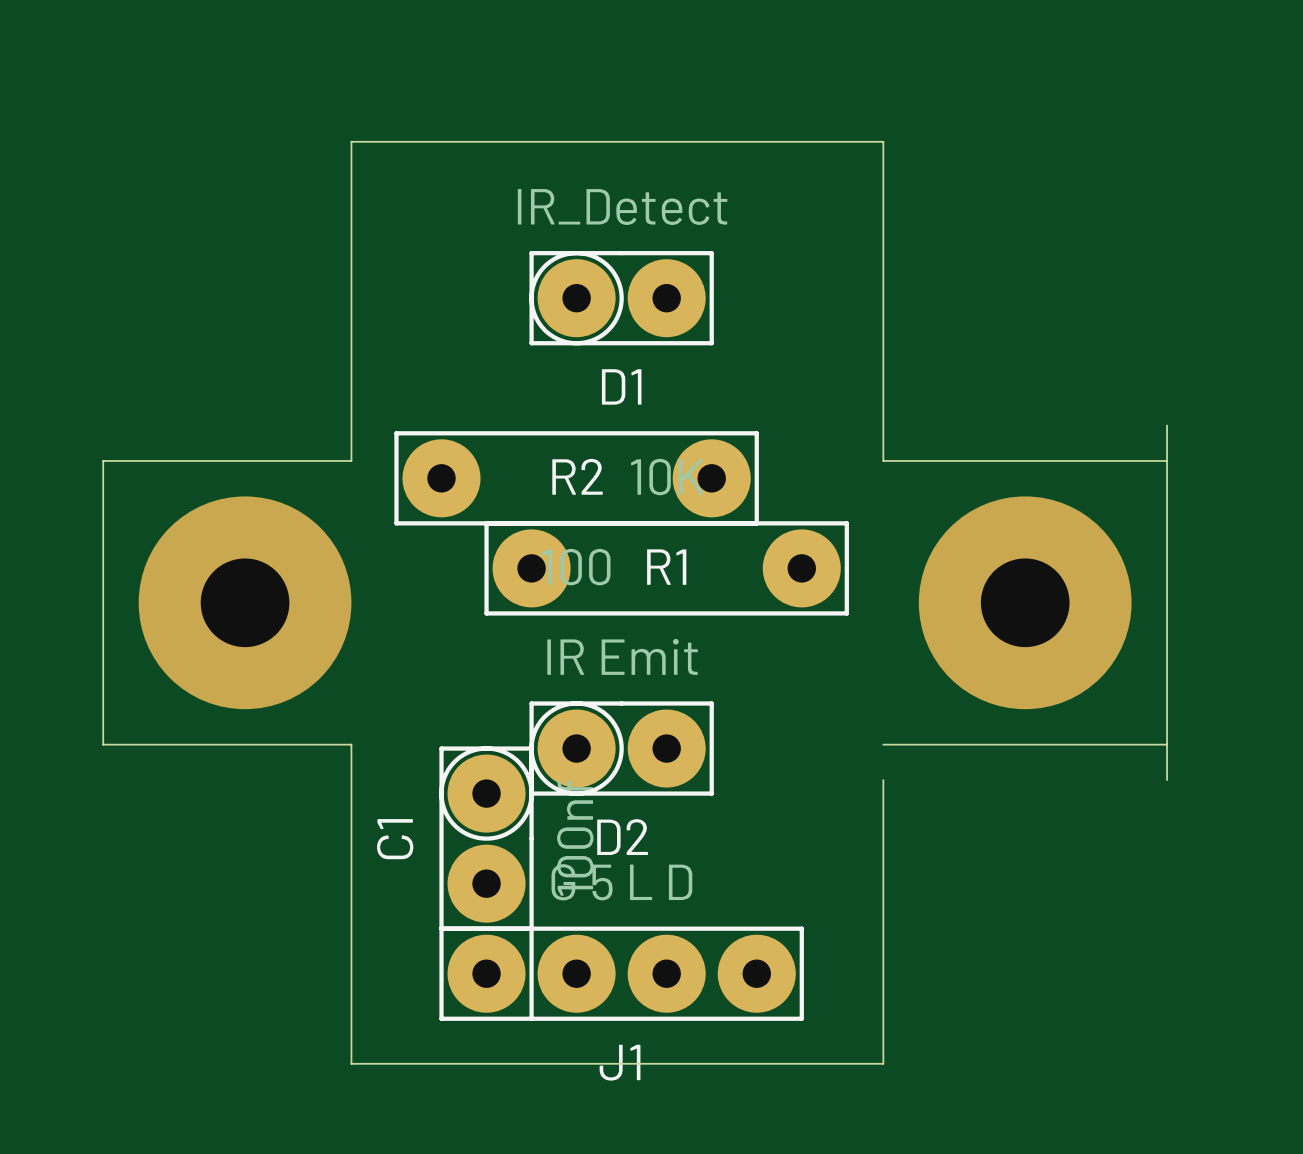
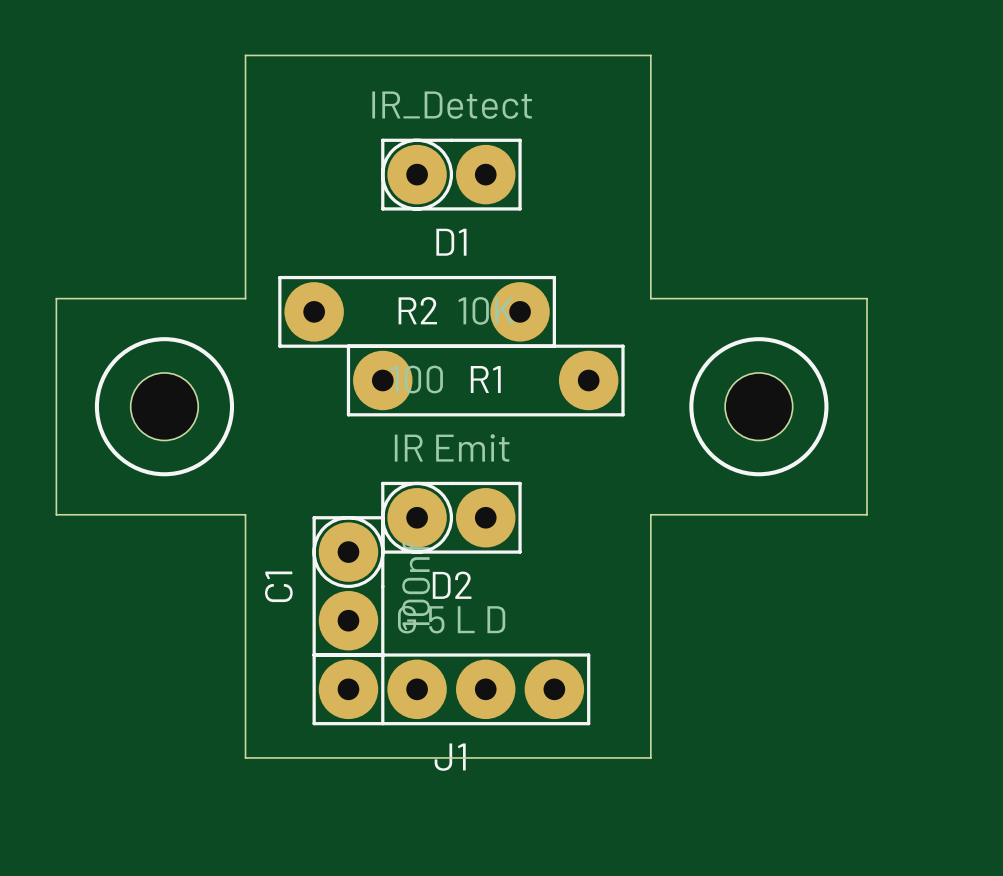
board edge: (1167, 425) (1167, 460) -> none
via: (245, 602) -> none
part: none -> (164, 406)
via: (1025, 602) -> none
part: none -> (758, 406)
board edge: (1167, 744) (1167, 780) -> (650, 514) (650, 541)

